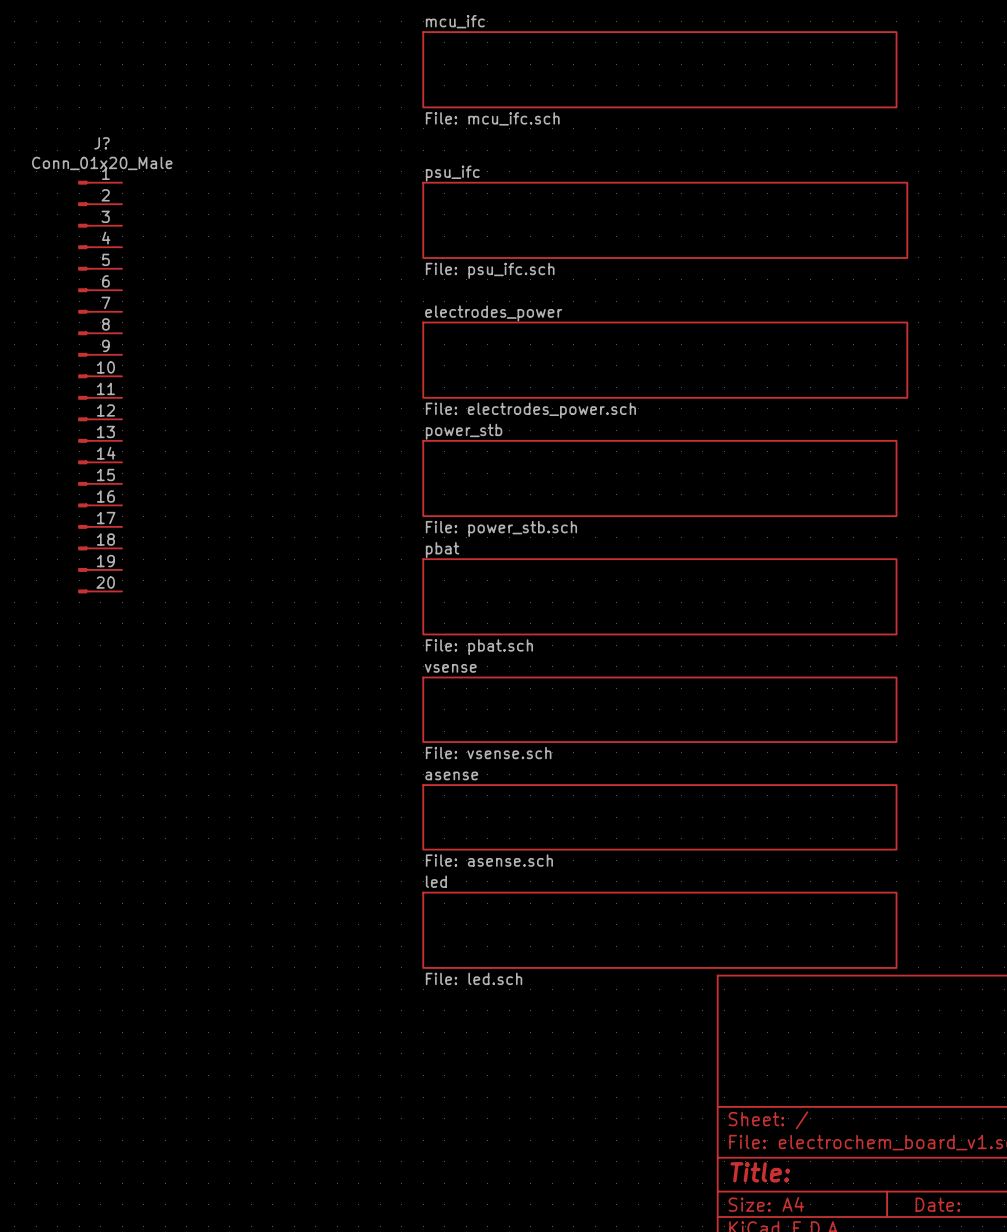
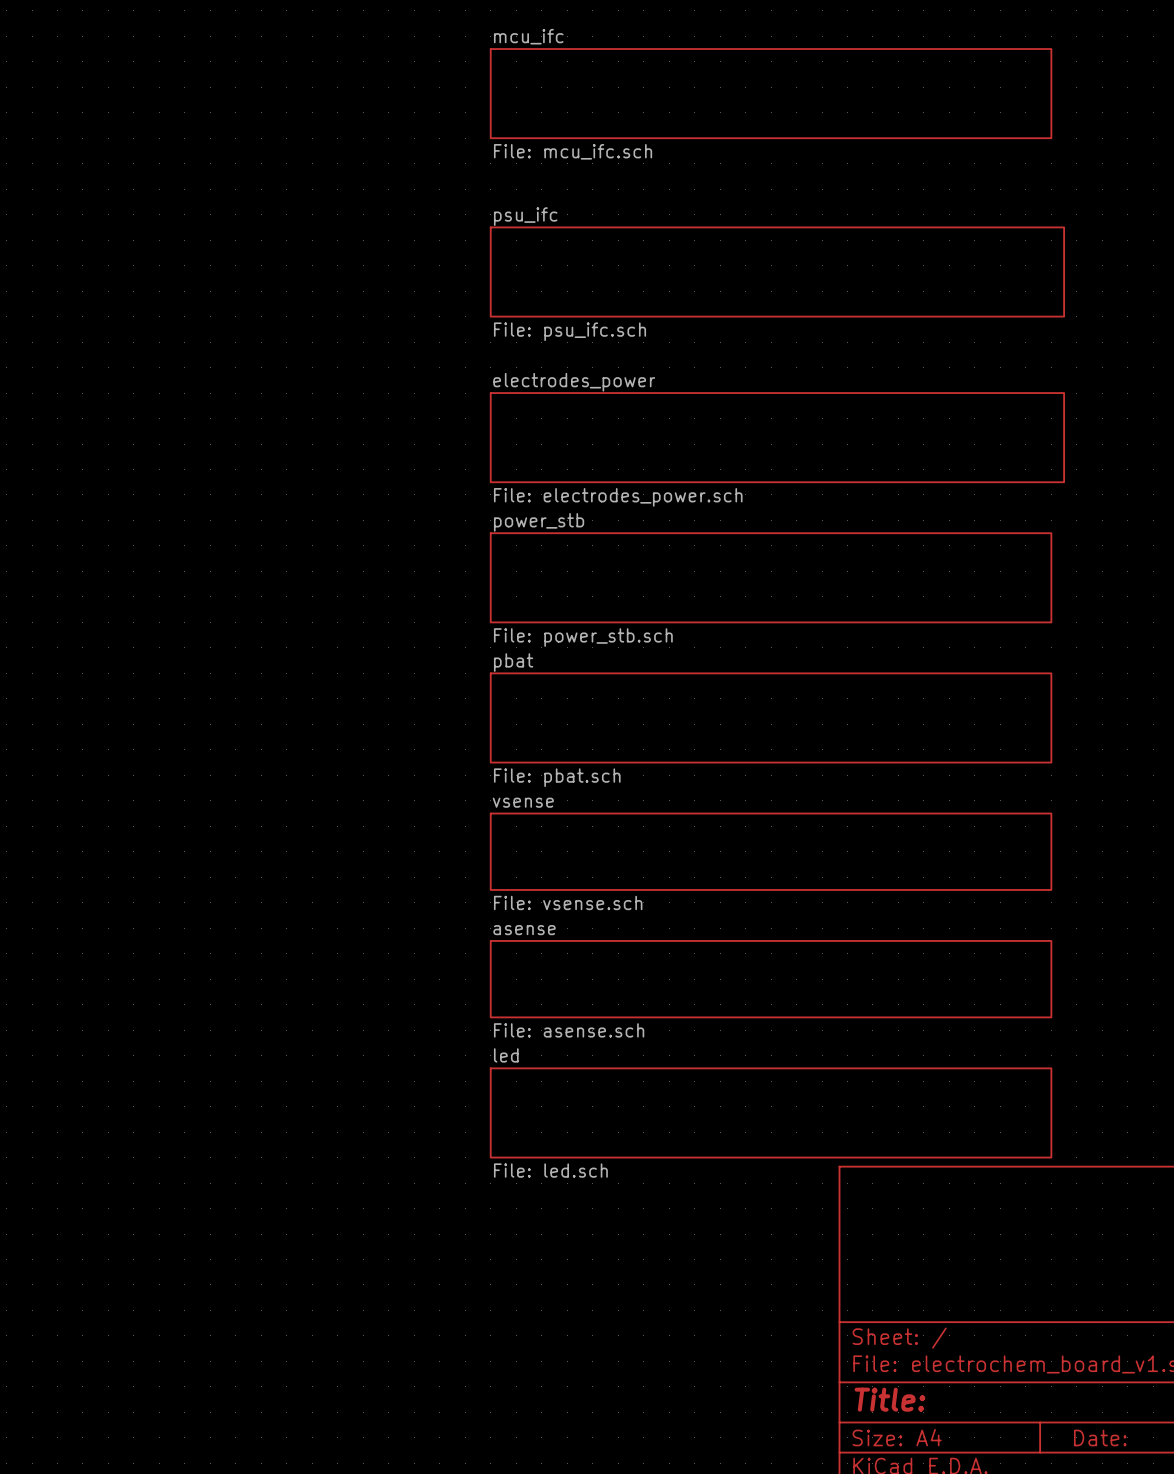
J?: Conn_01x20_Male (100, 387) -> none

